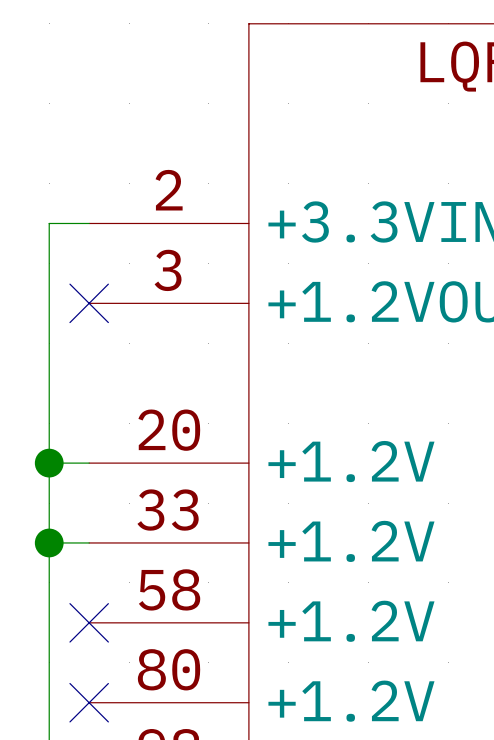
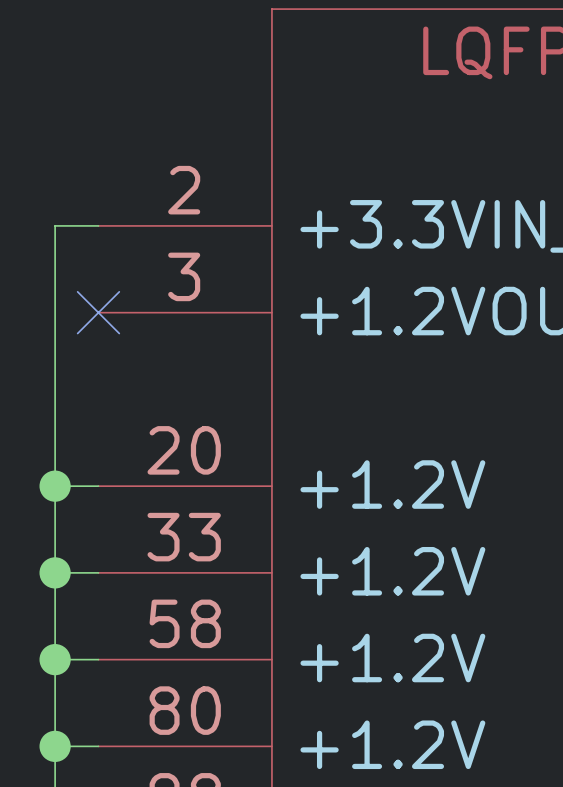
wire: none -> (55, 659) (98, 659)
junction: none -> (55, 659)
no-connect mark: (89, 622) -> none
wire: none -> (55, 746) (98, 746)
junction: none -> (55, 746)
no-connect mark: (89, 702) -> none

